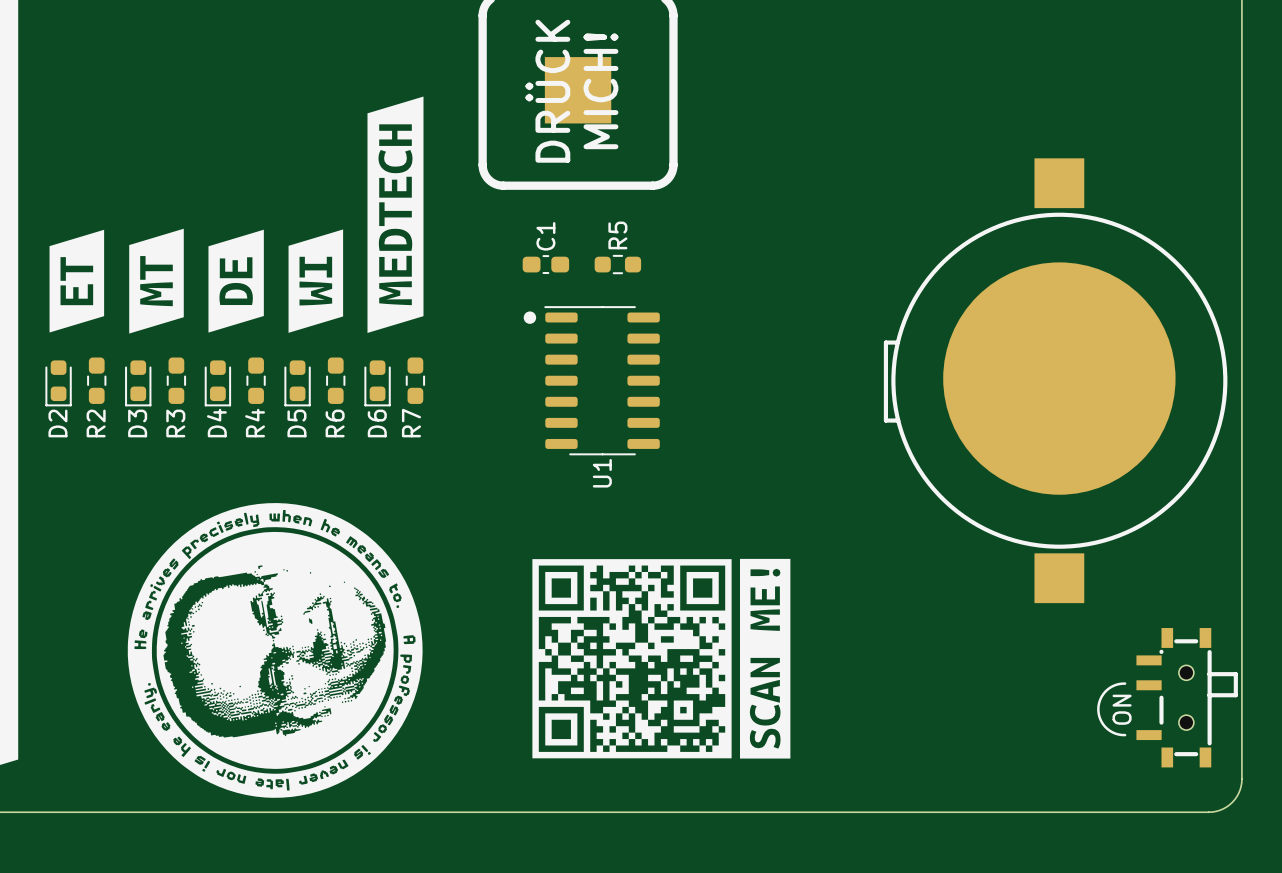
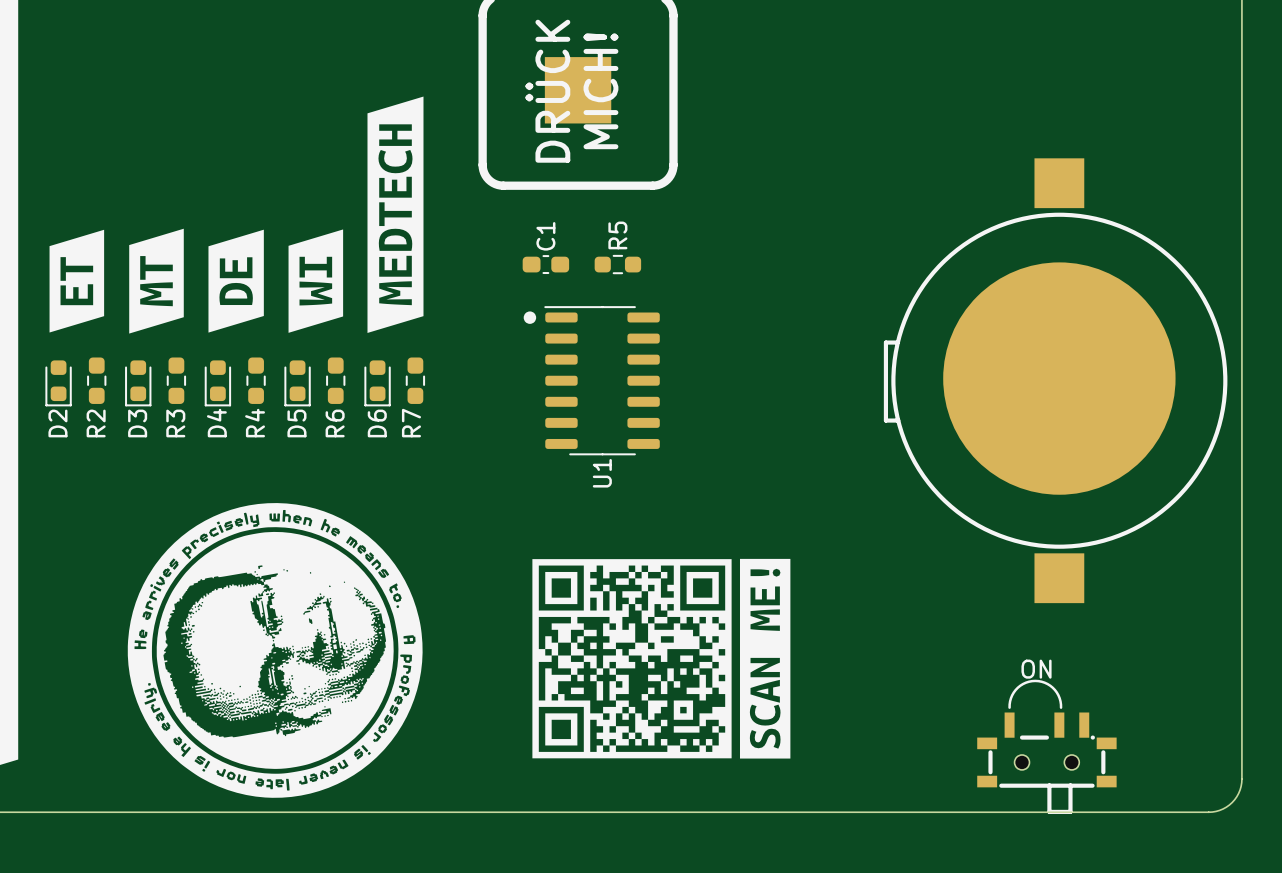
line: (1125, 683) (1115, 684) (1107, 689) (1101, 697) (1098, 709) (1100, 718) (1107, 728) (1115, 733) (1125, 735) -> none
part rotation: 0° (1187, 697) -> 90° clockwise (1046, 763)
part position: (1187, 697) -> (1046, 763)
line: none -> (1061, 707) (1059, 698) (1052, 687) (1044, 682) (1035, 680) (1023, 684) (1015, 690) (1010, 698) (1009, 707)
text rotation: 0° (1122, 709) -> 90° clockwise (1036, 669)
text position: ON (1122, 709) -> ON (1036, 669)

